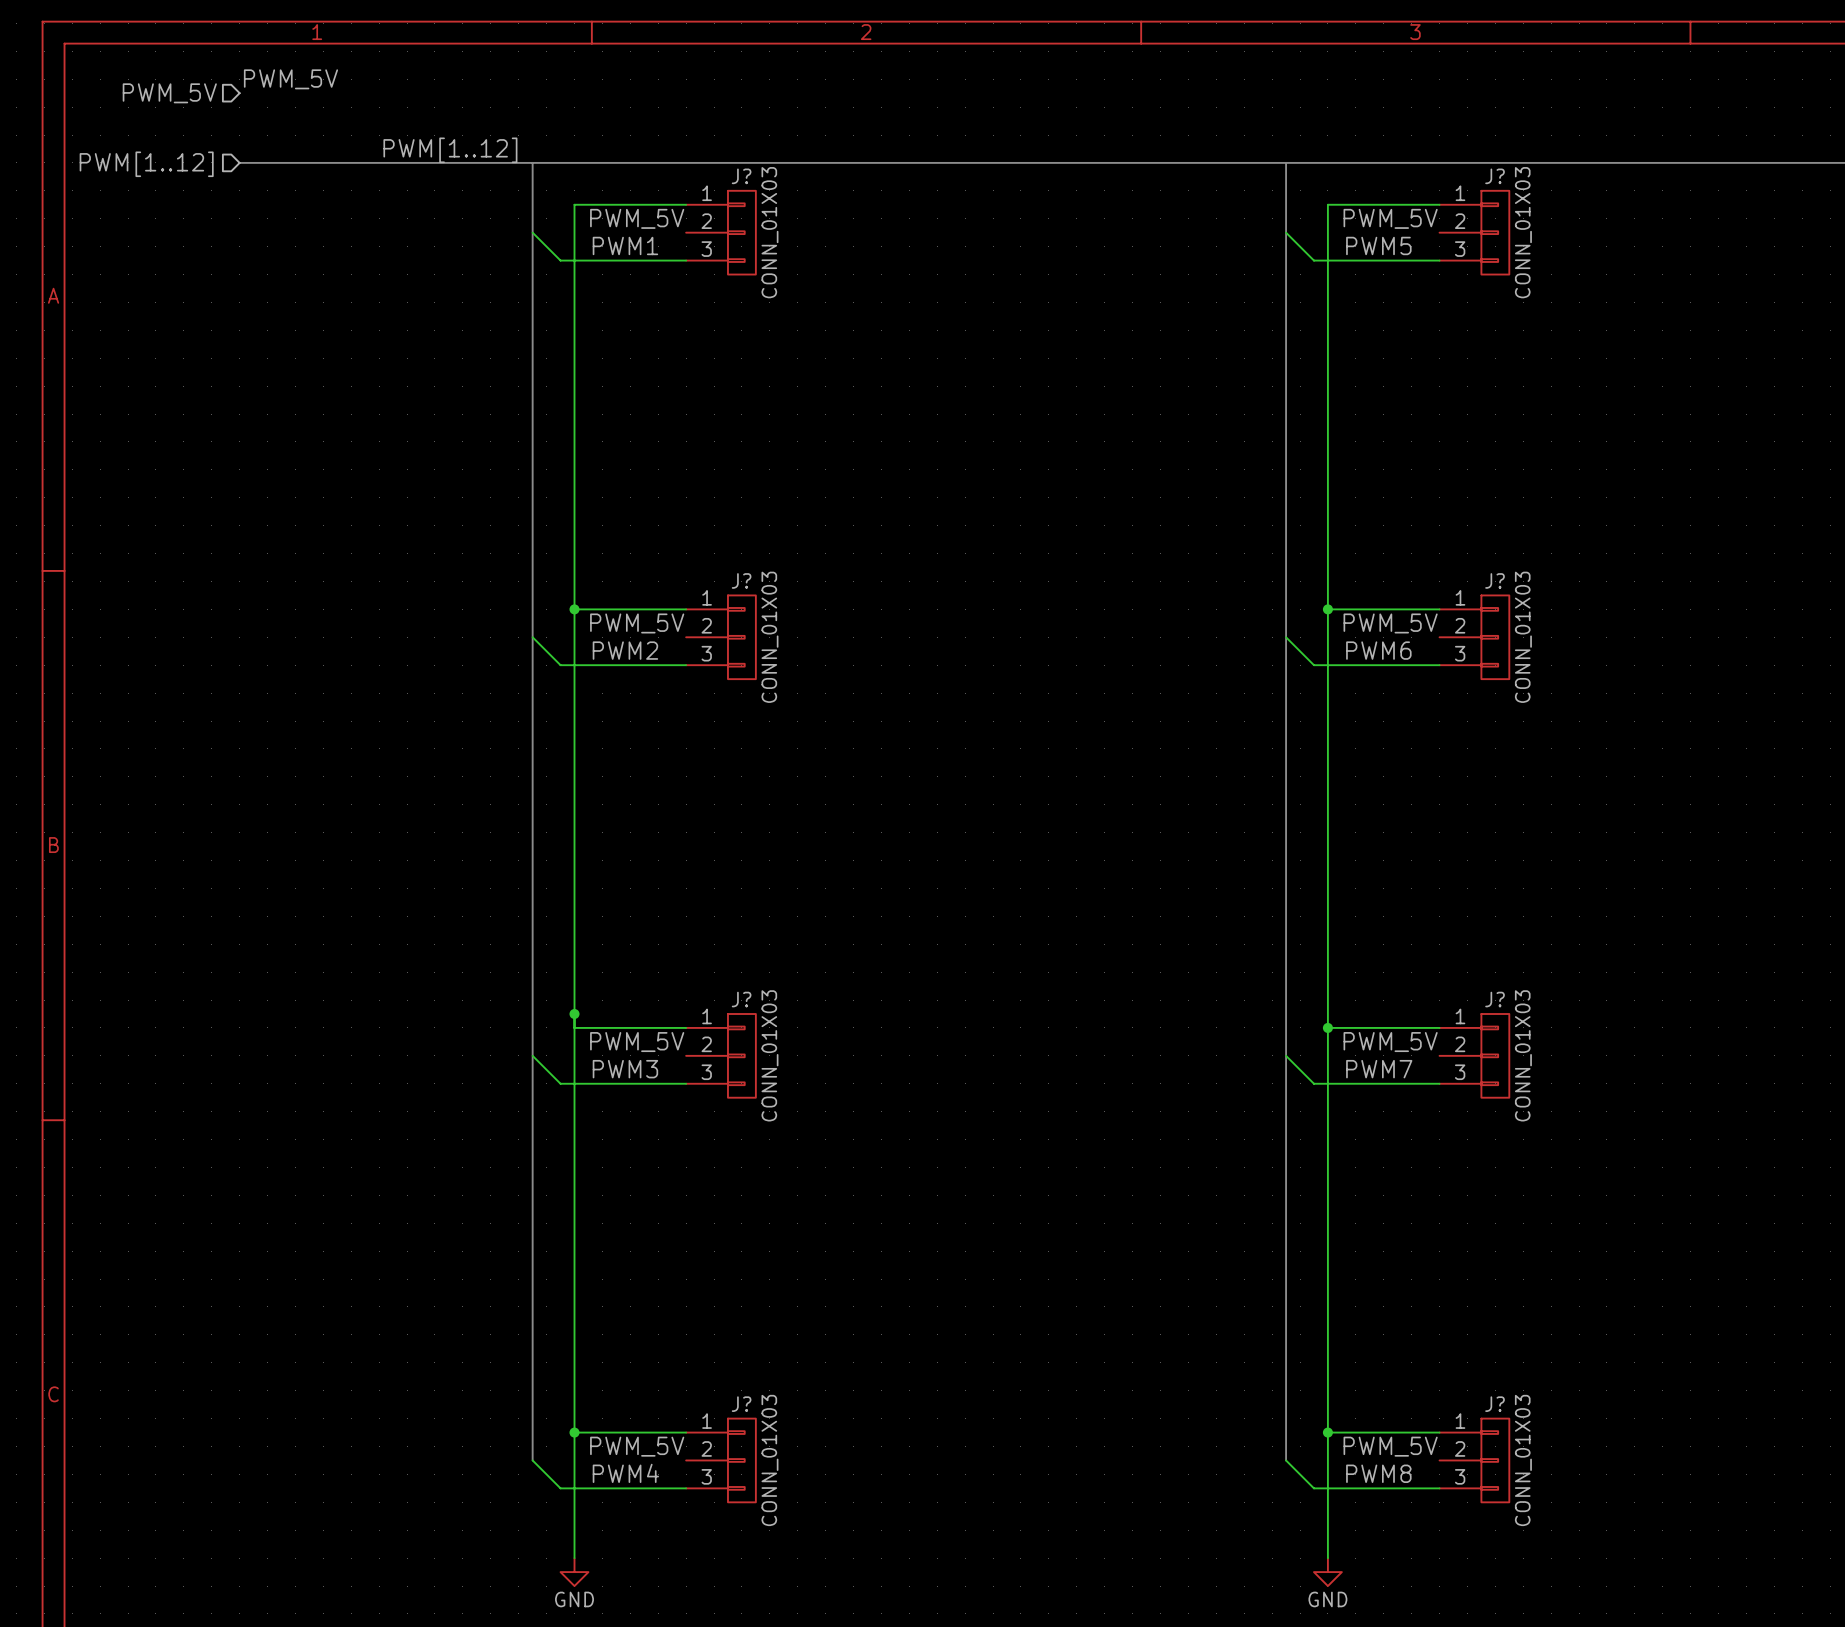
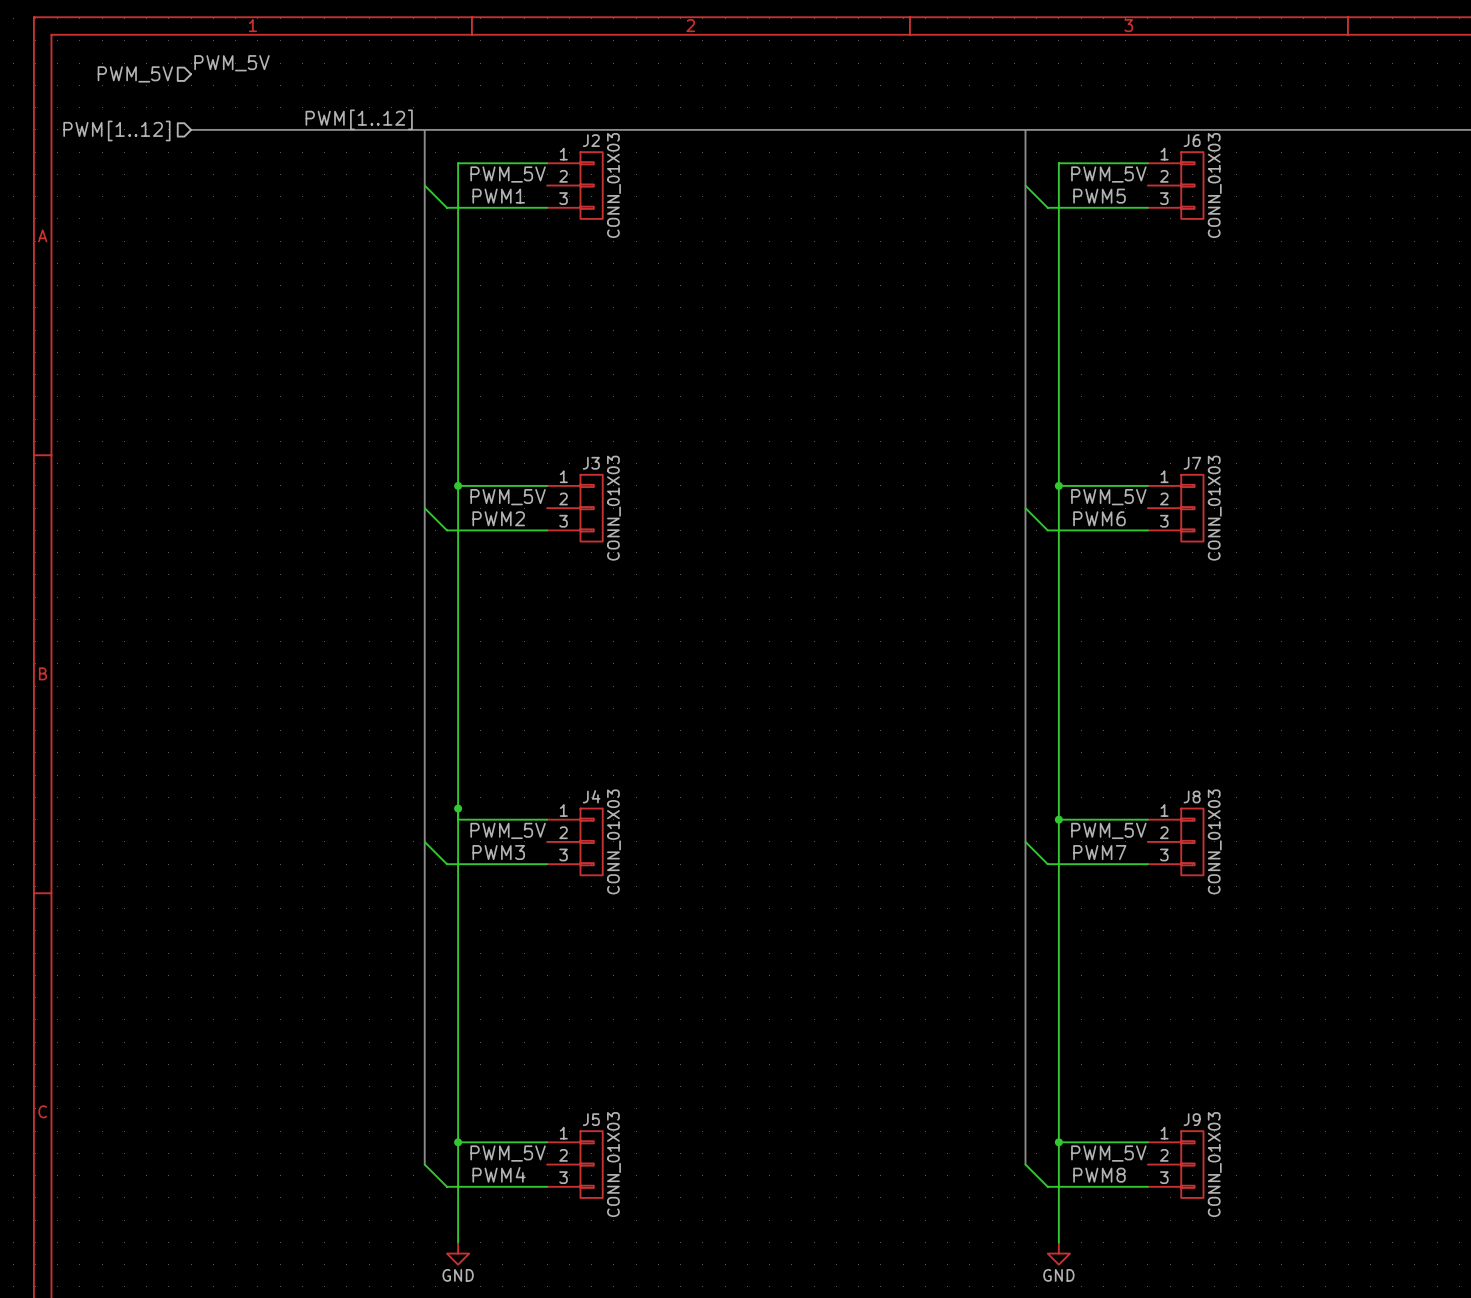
J? name: J? (741, 176) -> J2 (591, 140)
J? name: J? (1495, 176) -> J6 (1192, 140)
J? name: J? (741, 580) -> J3 (591, 463)
J? name: J? (1495, 580) -> J7 (1192, 463)
J? name: J? (741, 999) -> J4 (591, 796)
J? name: J? (1495, 999) -> J8 (1192, 797)
J? name: J? (741, 1404) -> J5 (591, 1119)
J? name: J? (1495, 1404) -> J9 (1192, 1119)

